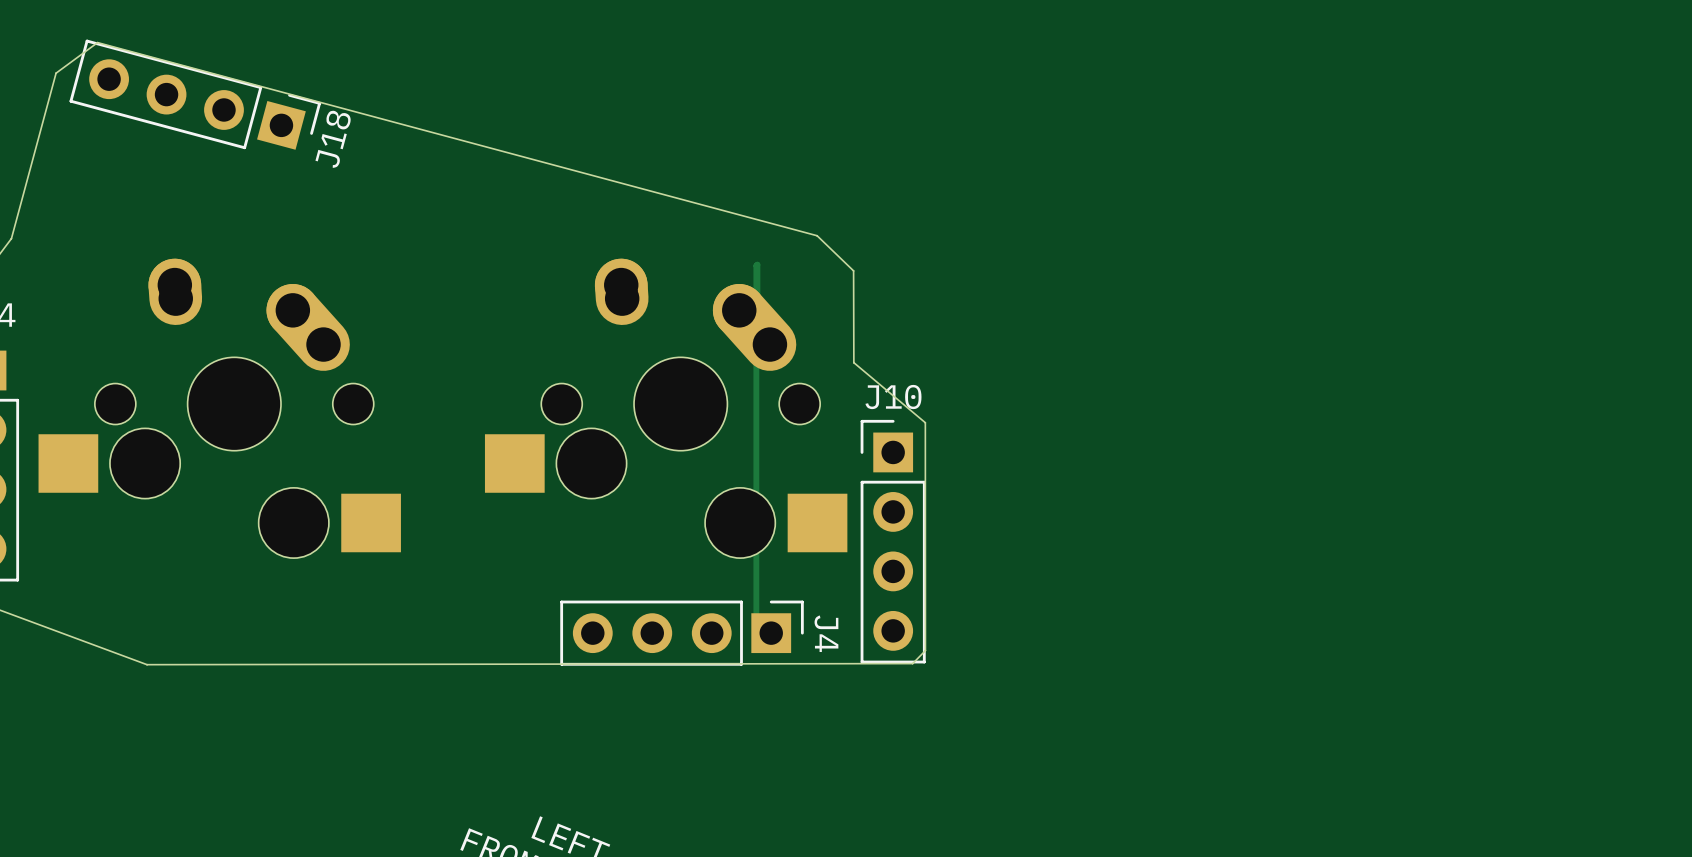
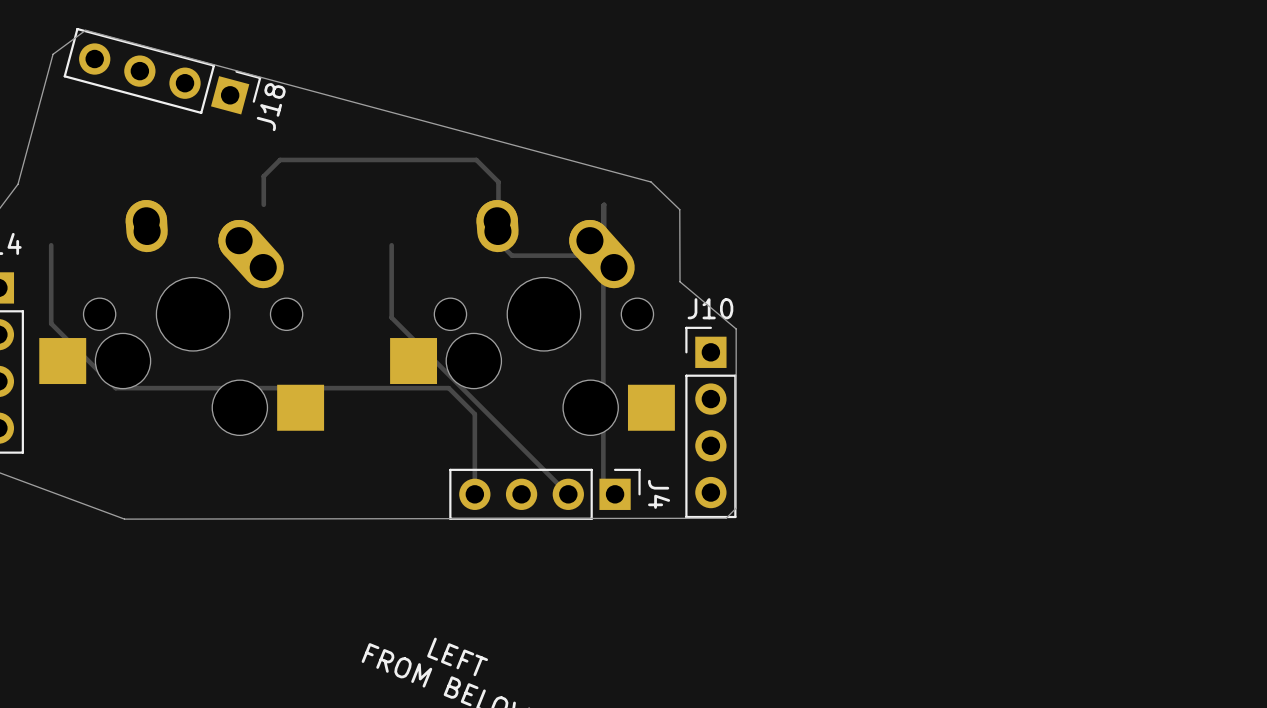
track: none -> (263, 204) (263, 176) (280, 159) (476, 159) (498, 182) (498, 242) (512, 255) (581, 255)
track: none -> (51, 245) (51, 323) (115, 388) (448, 388) (474, 414) (474, 494)
track: none -> (391, 245) (391, 317) (568, 494)

